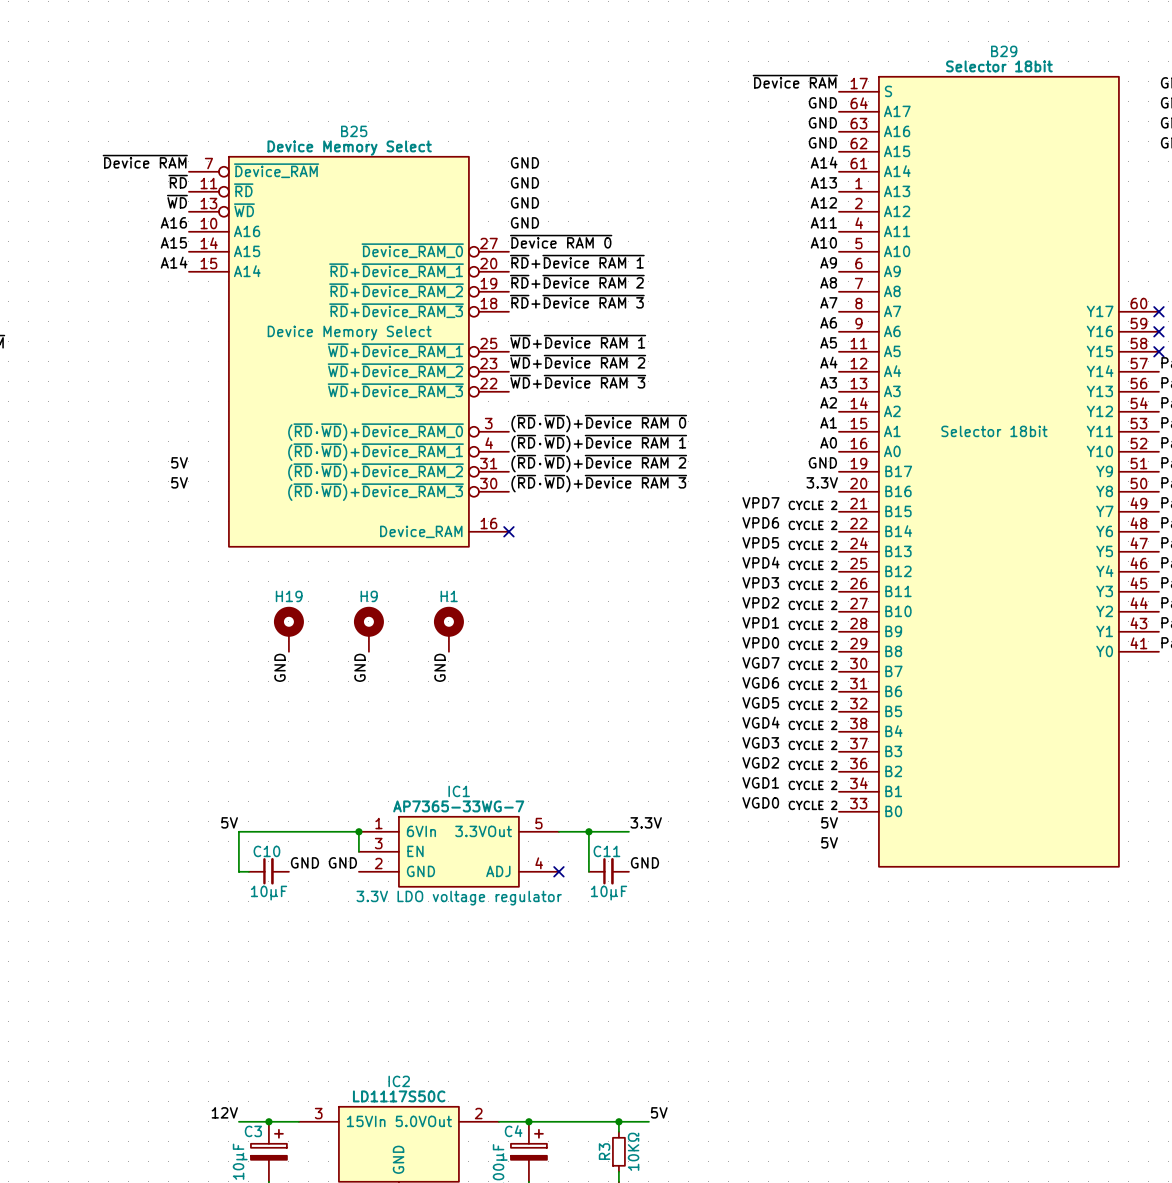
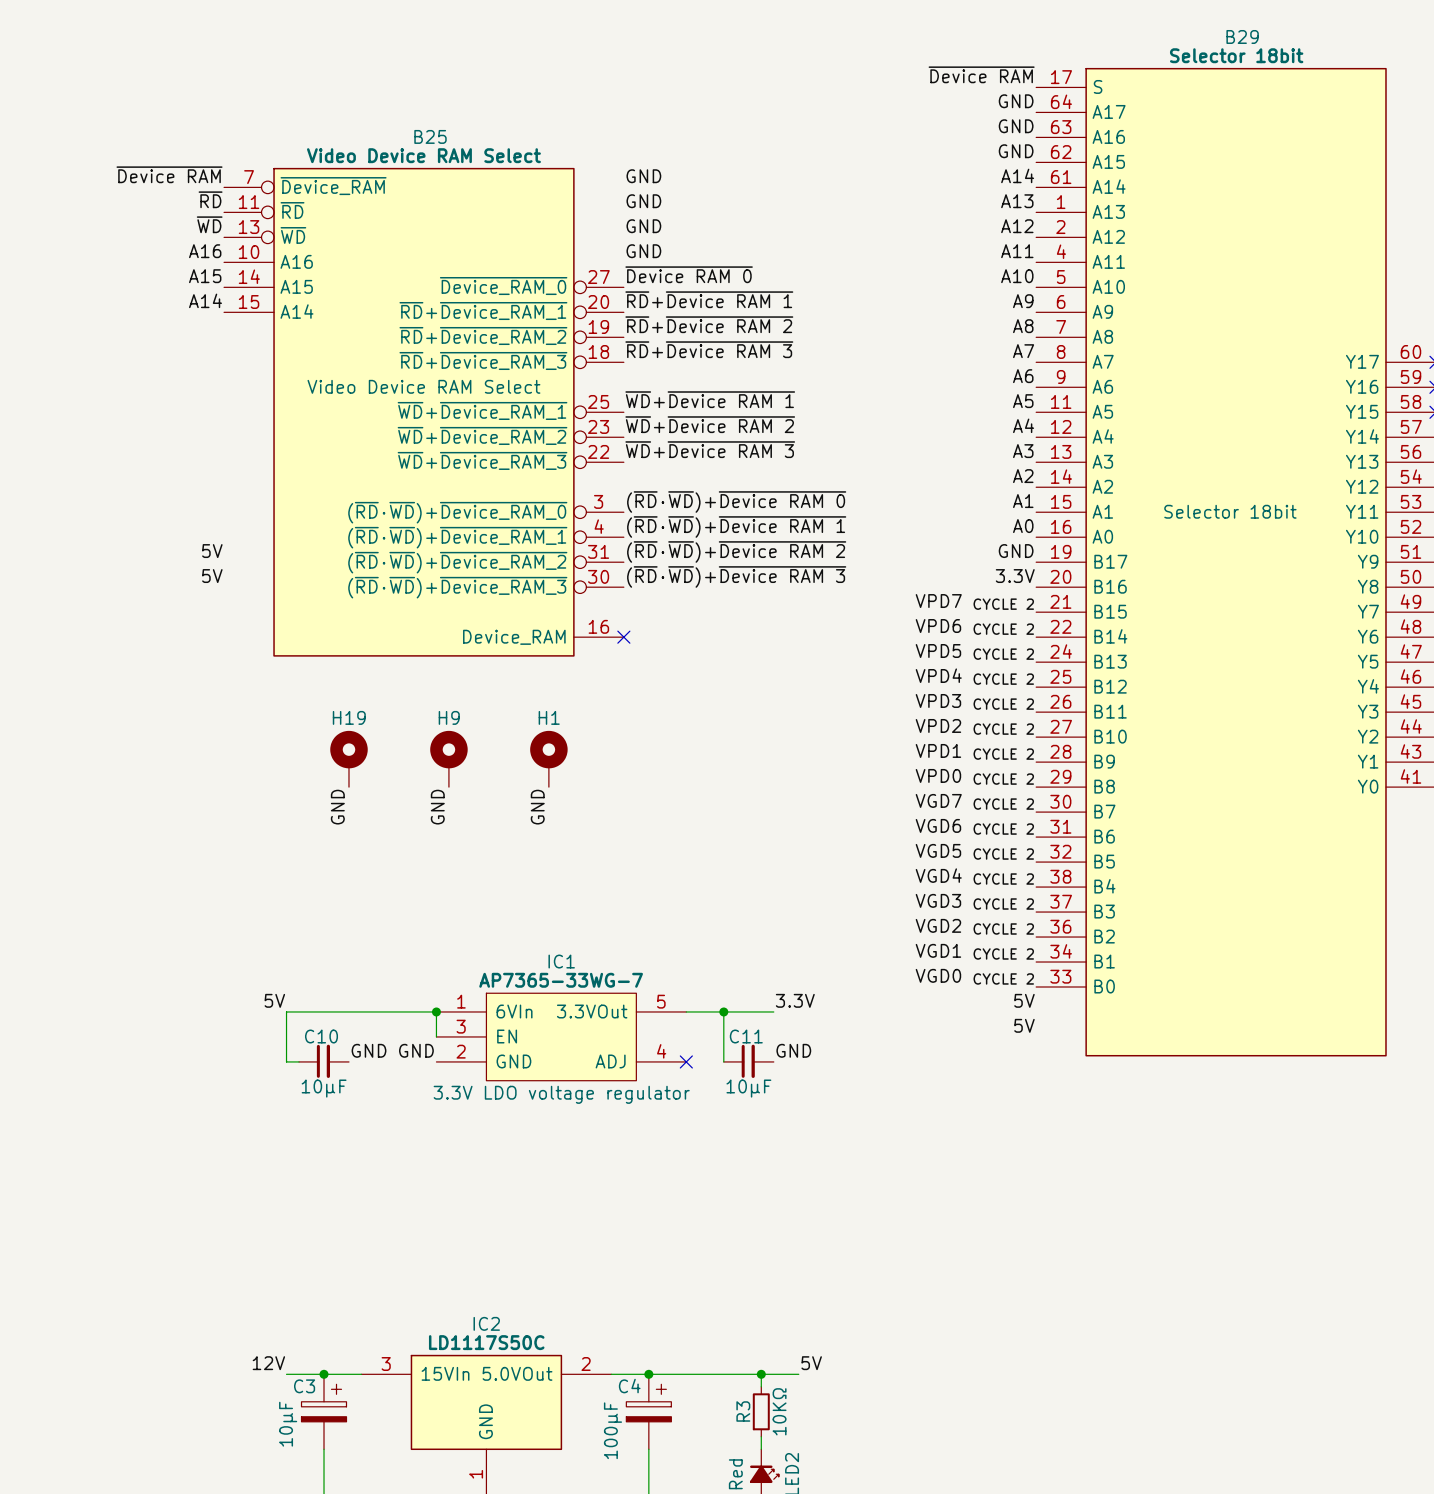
B25 value: Device Memory Select (349, 148) -> Video Device RAM Select (423, 155)
B25 text: Device Memory Select (349, 333) -> Video Device RAM Select (423, 386)

